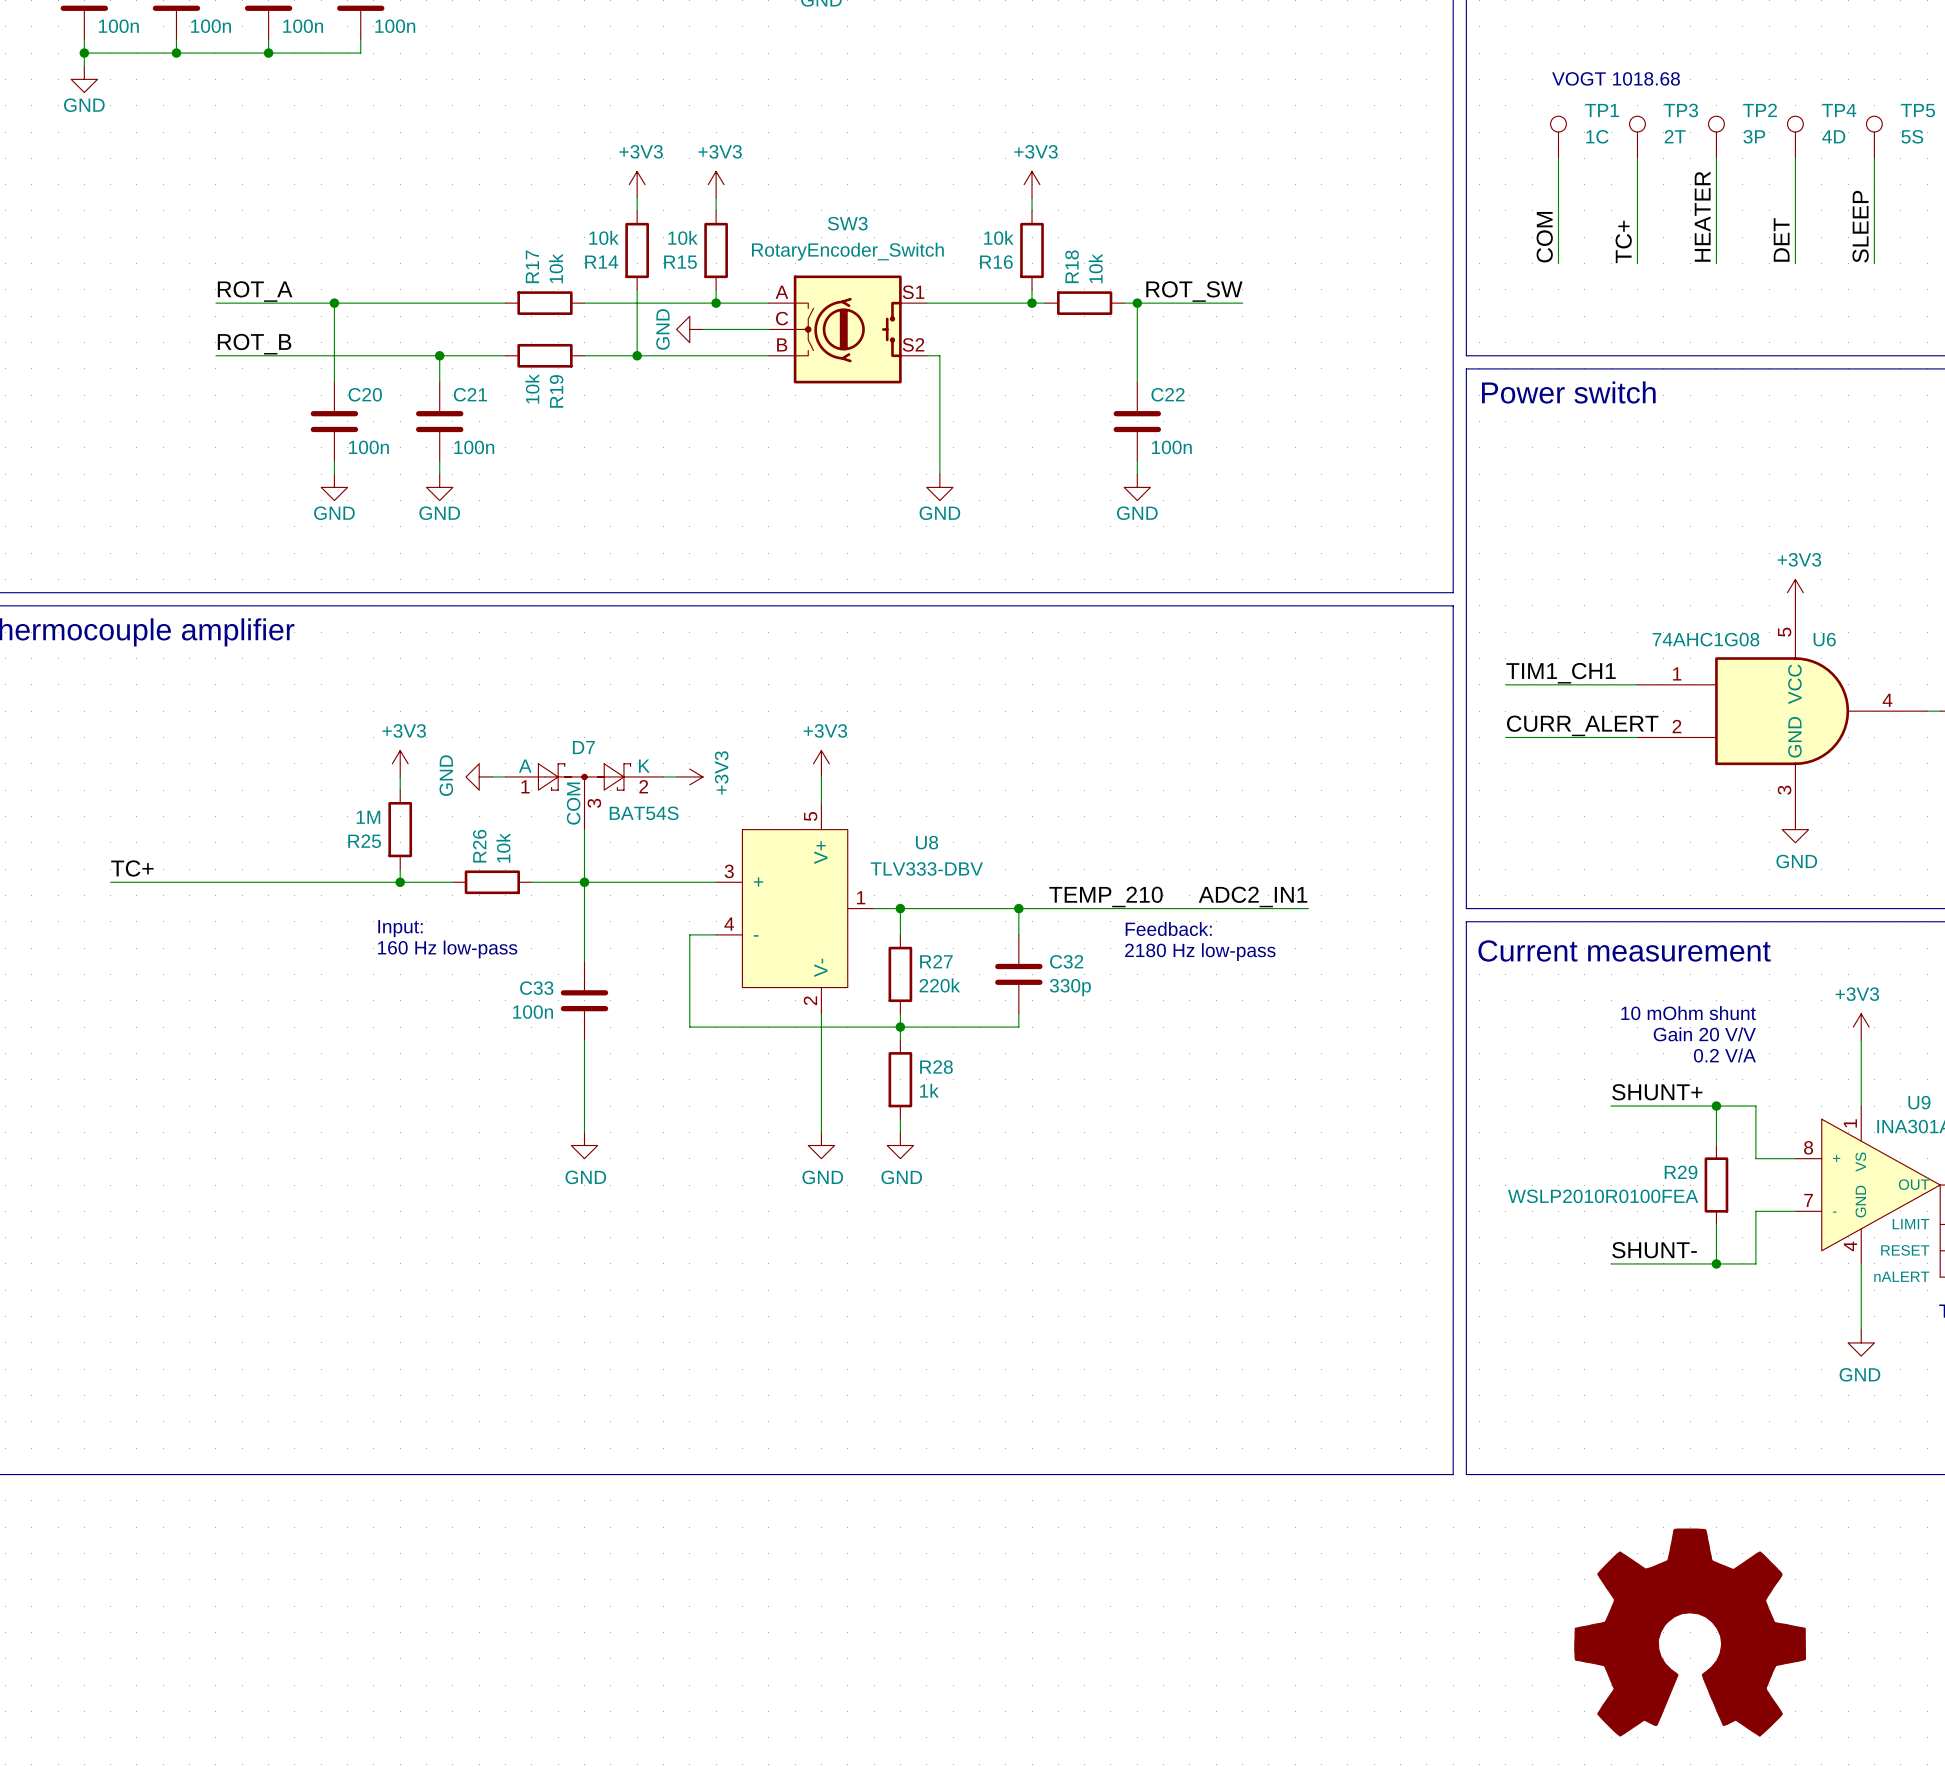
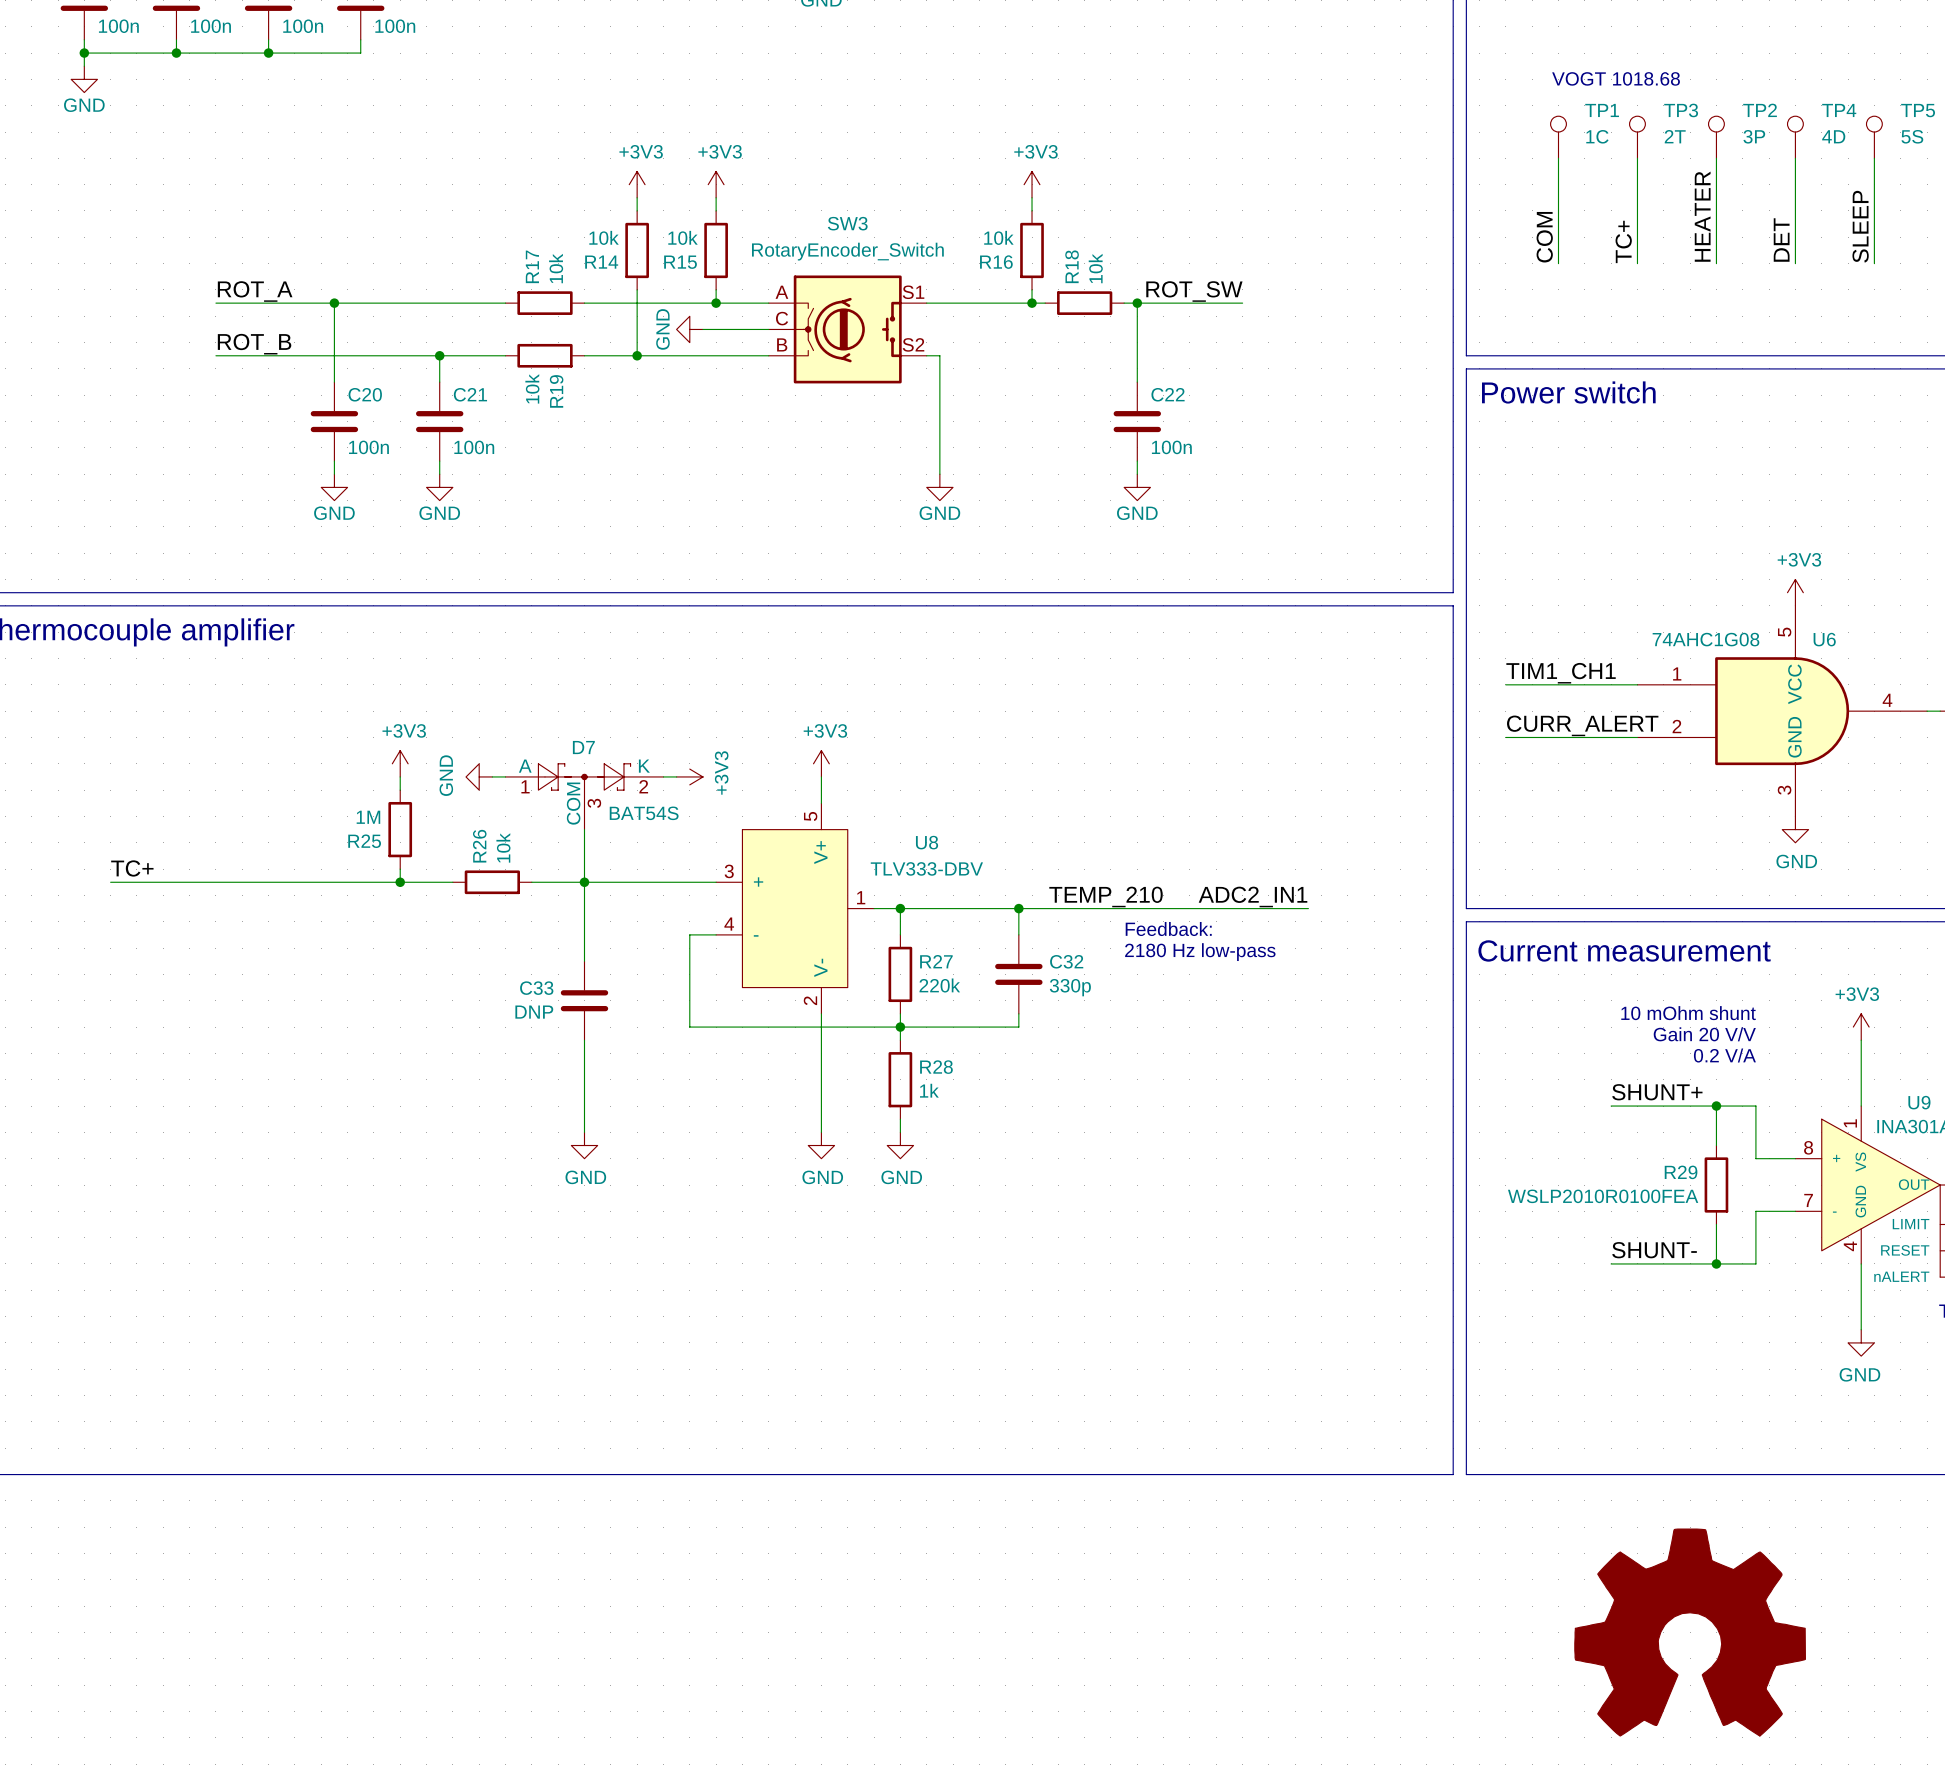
text: Input: (400, 928) -> none
text: 160 Hz low-pass (447, 949) -> none
C33 value: 100n (533, 1012) -> DNP (534, 1012)

